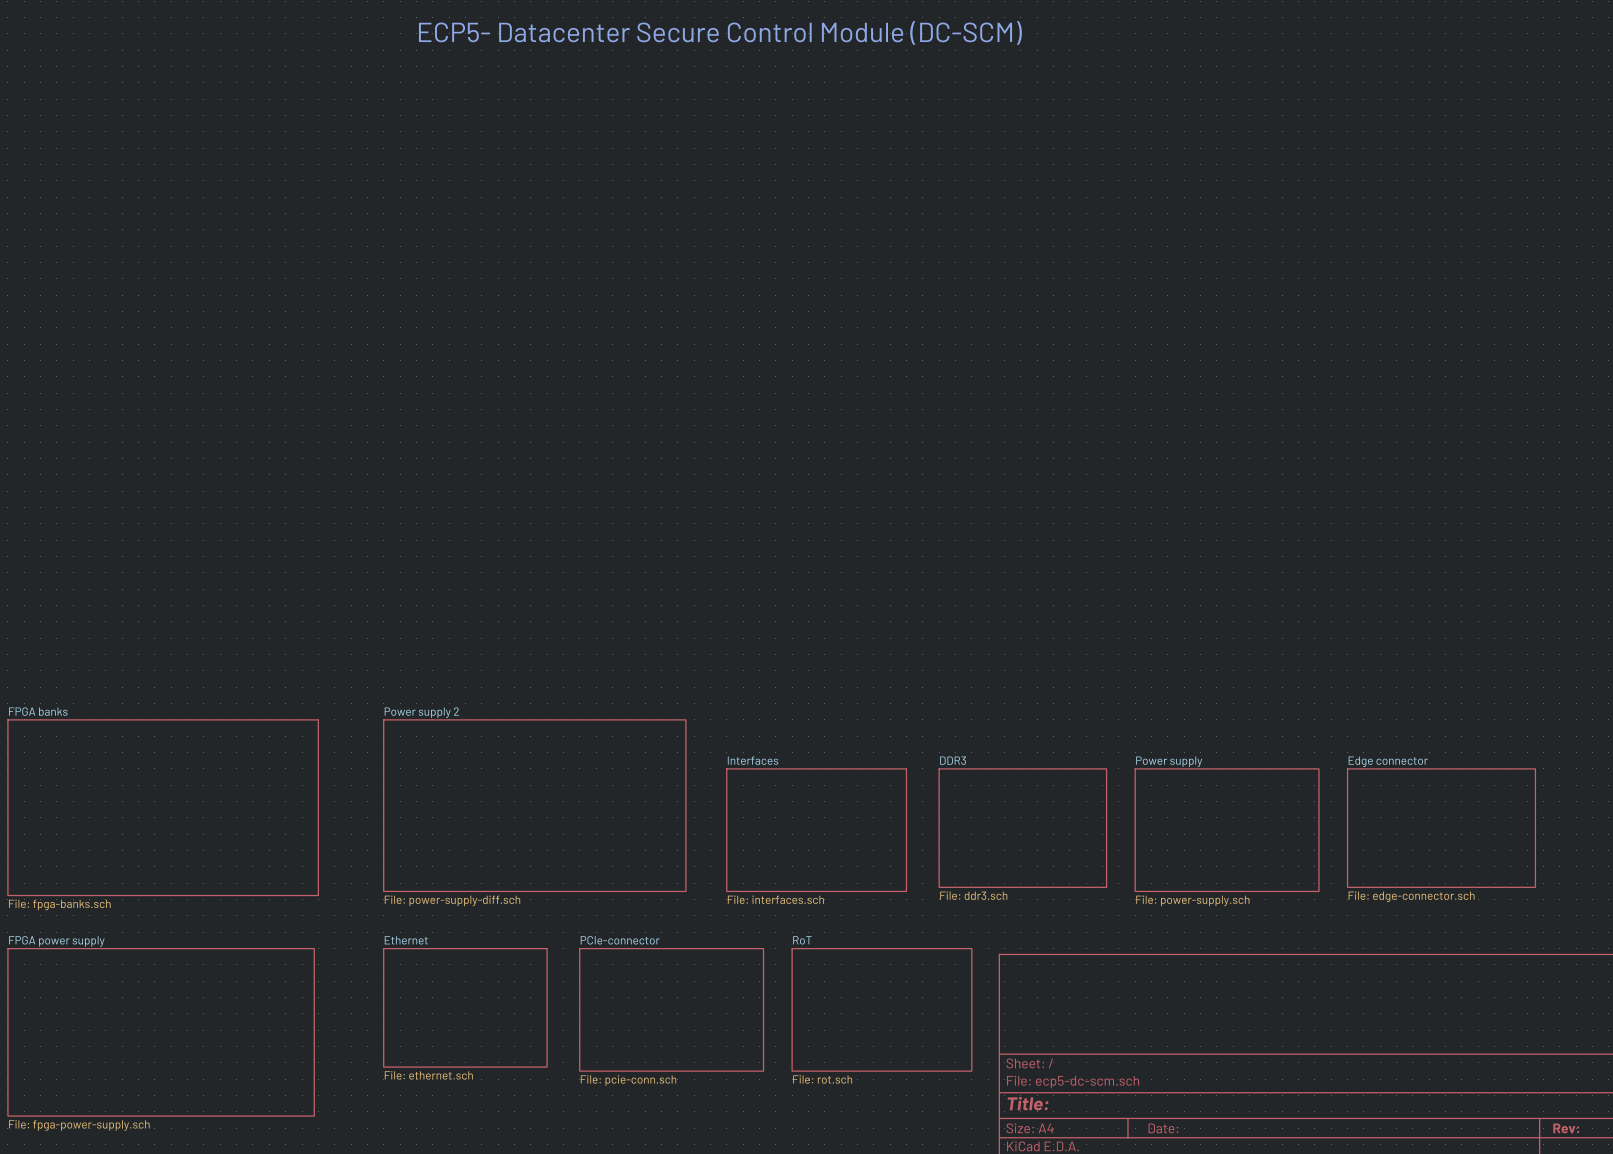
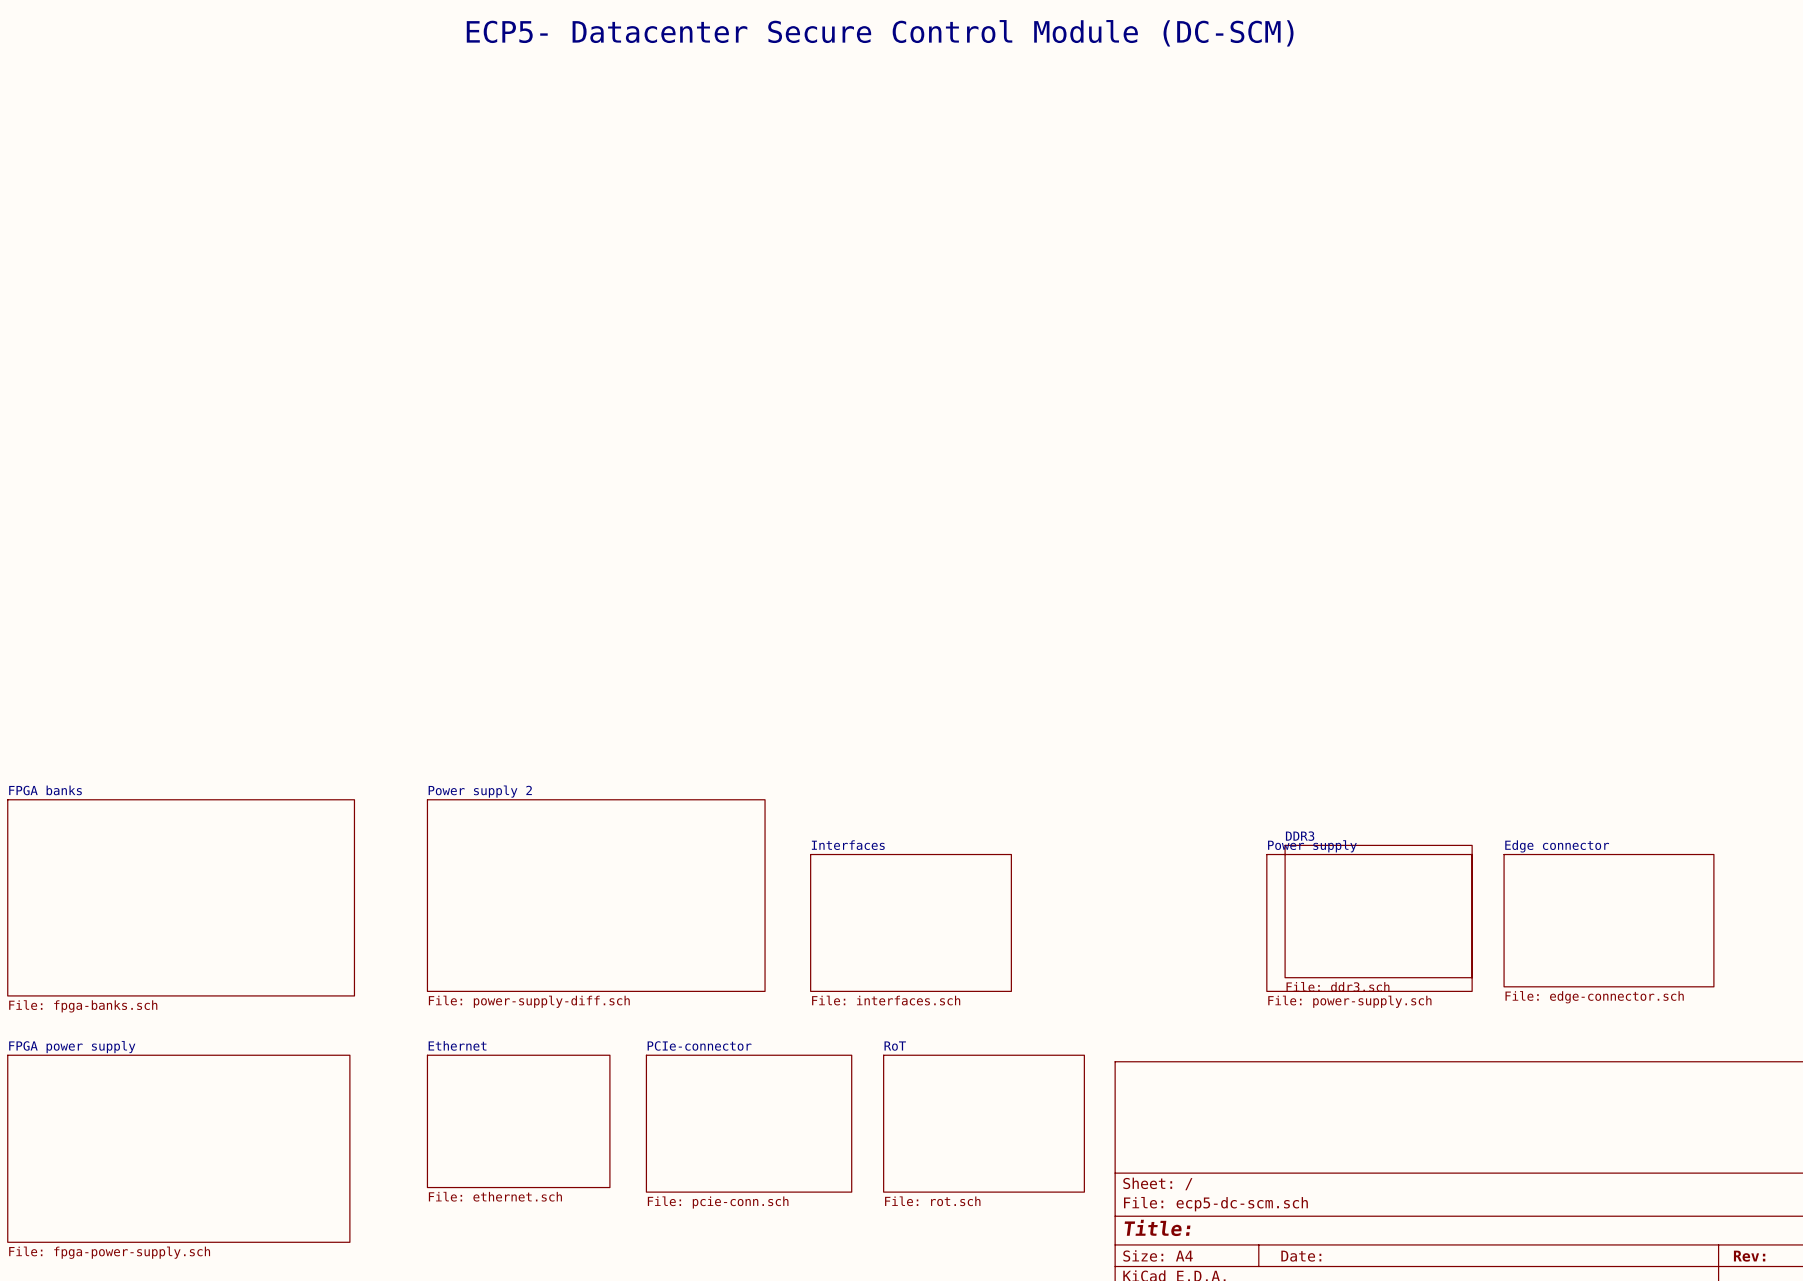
sheet DDR3 position: (1022, 828) -> (1378, 911)

